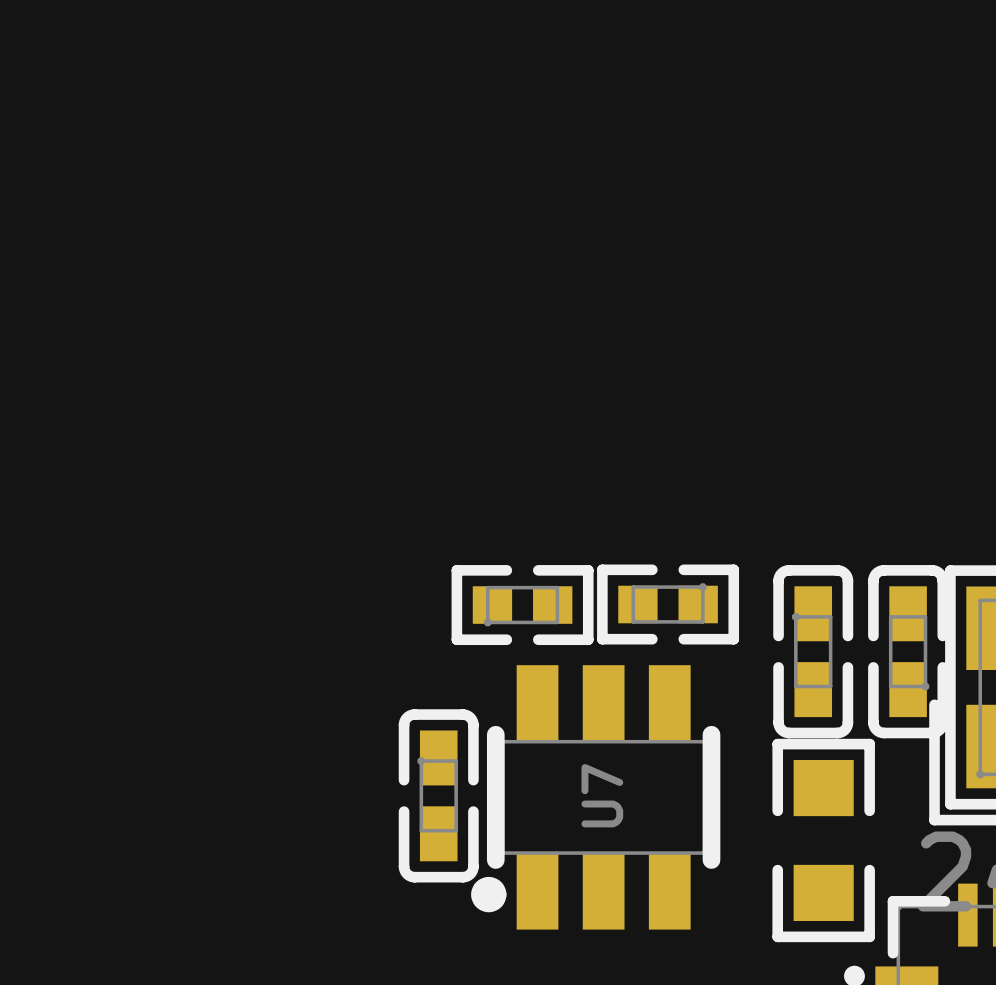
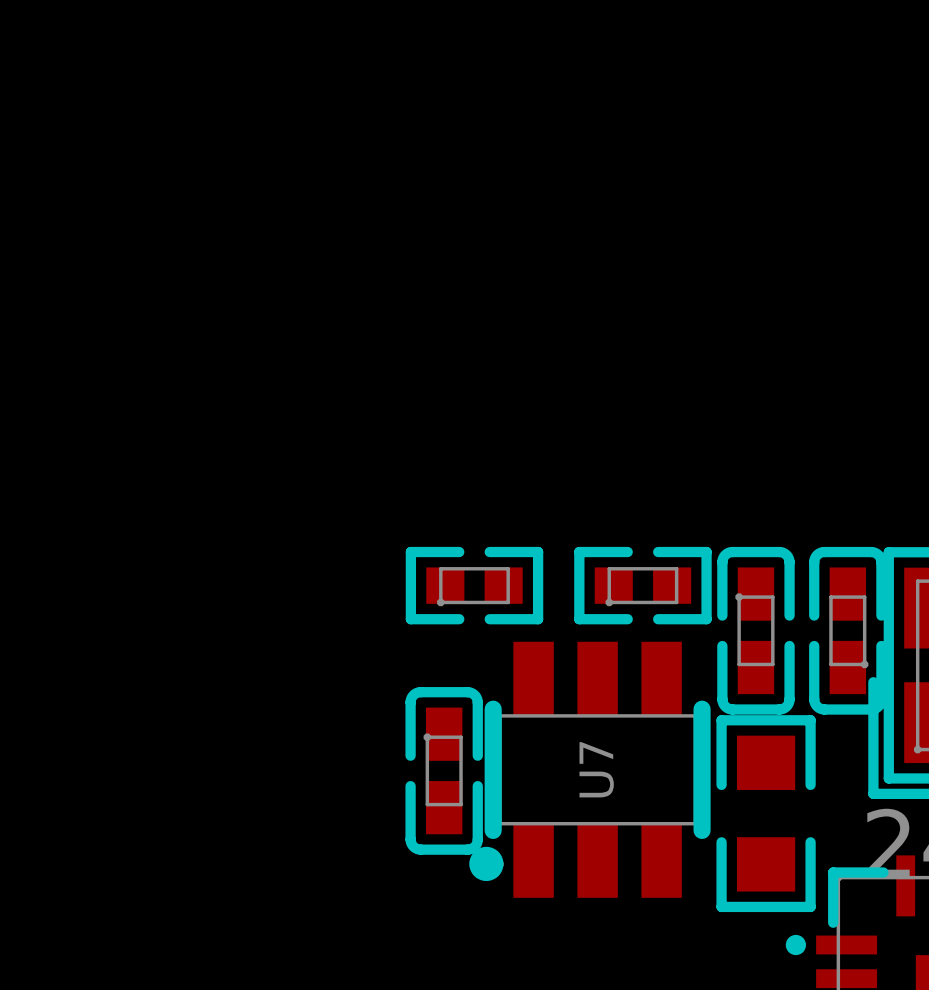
part rotation: 0° (668, 604) -> 180° (642, 585)
part position: (438, 795) -> (444, 770)
U7 position: (595, 797) -> (589, 769)

